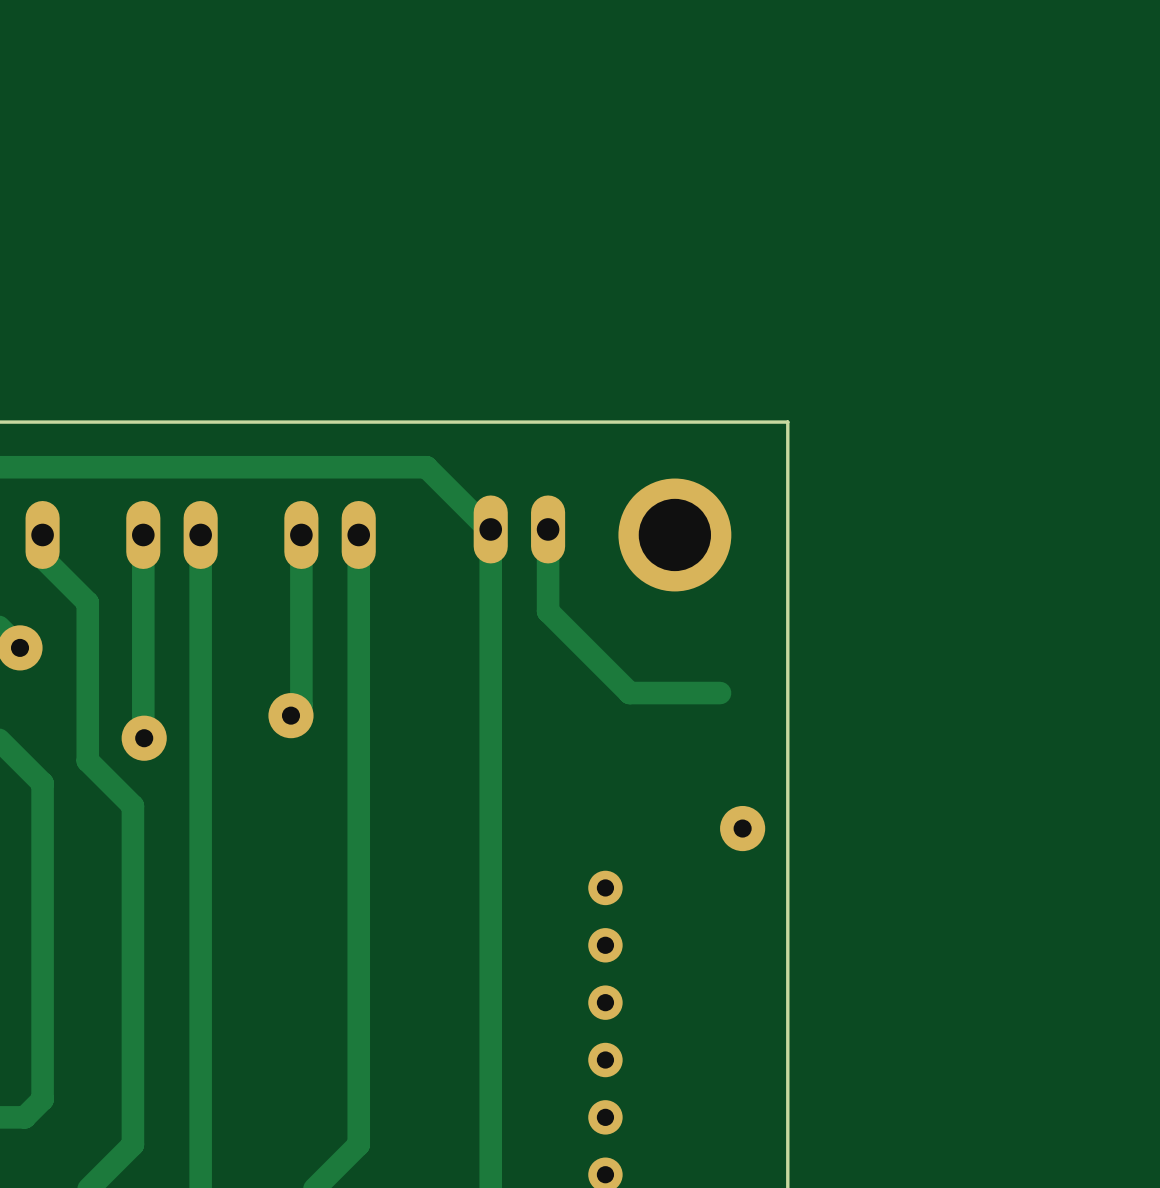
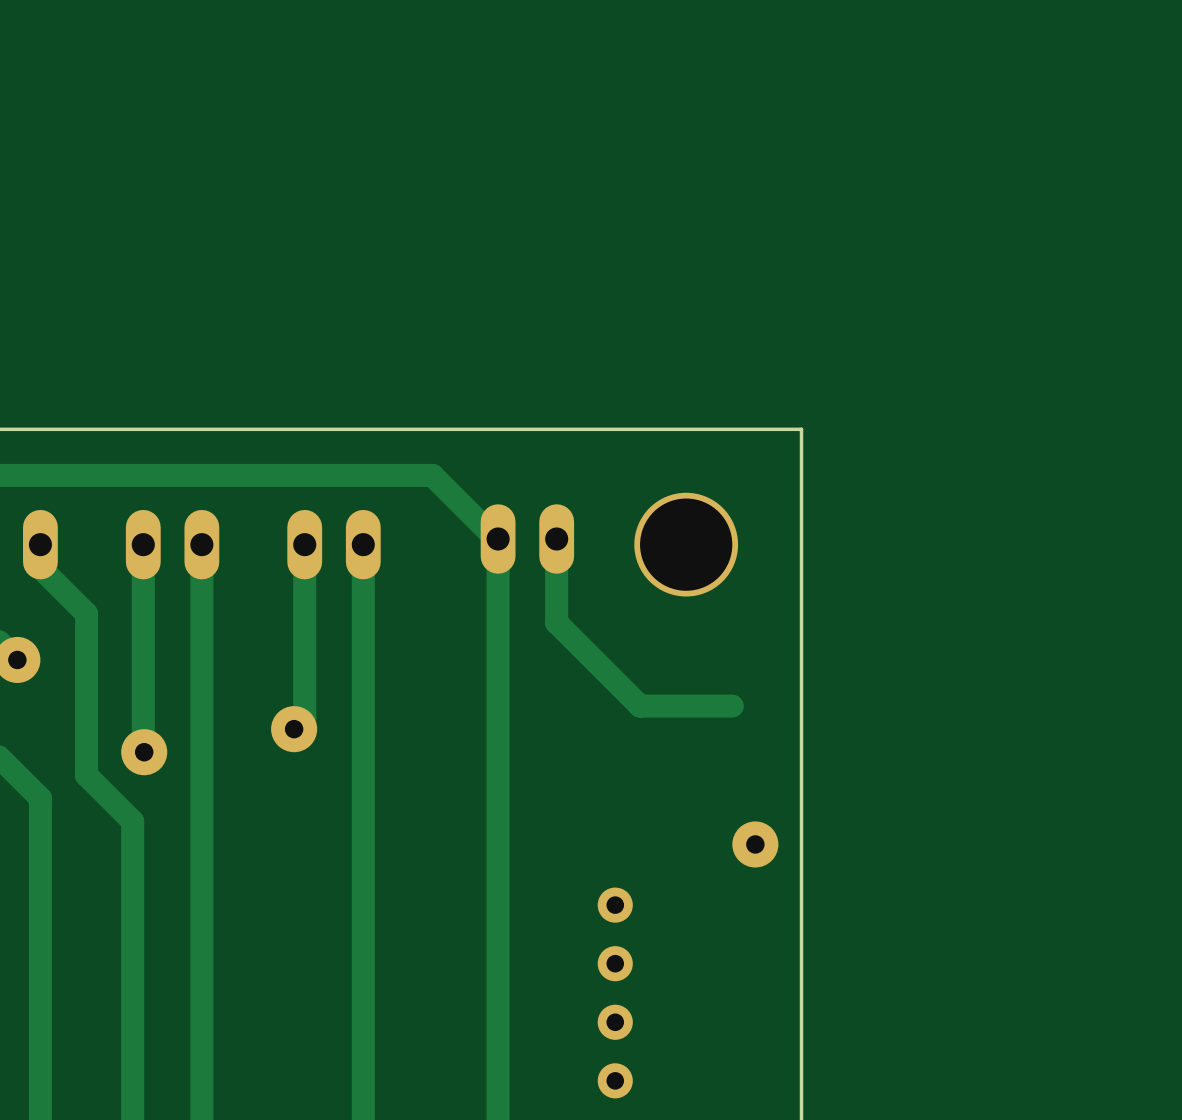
part footprint: [618, 478, 732, 592] -> [634, 492, 739, 597]

